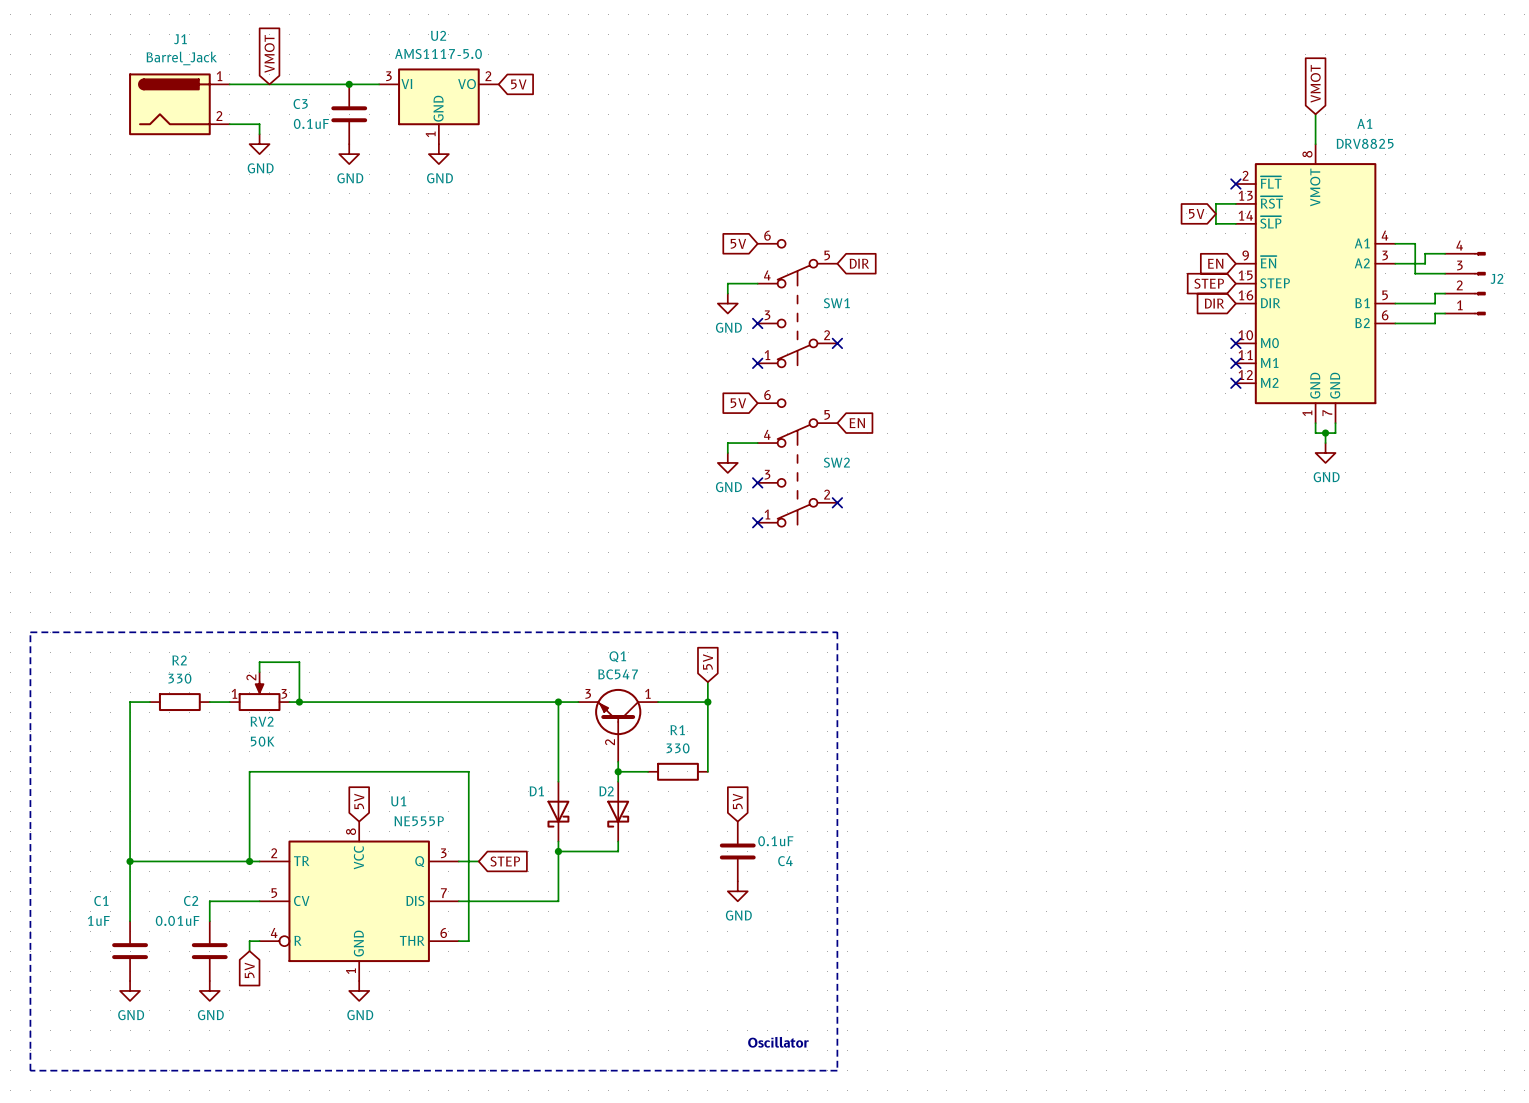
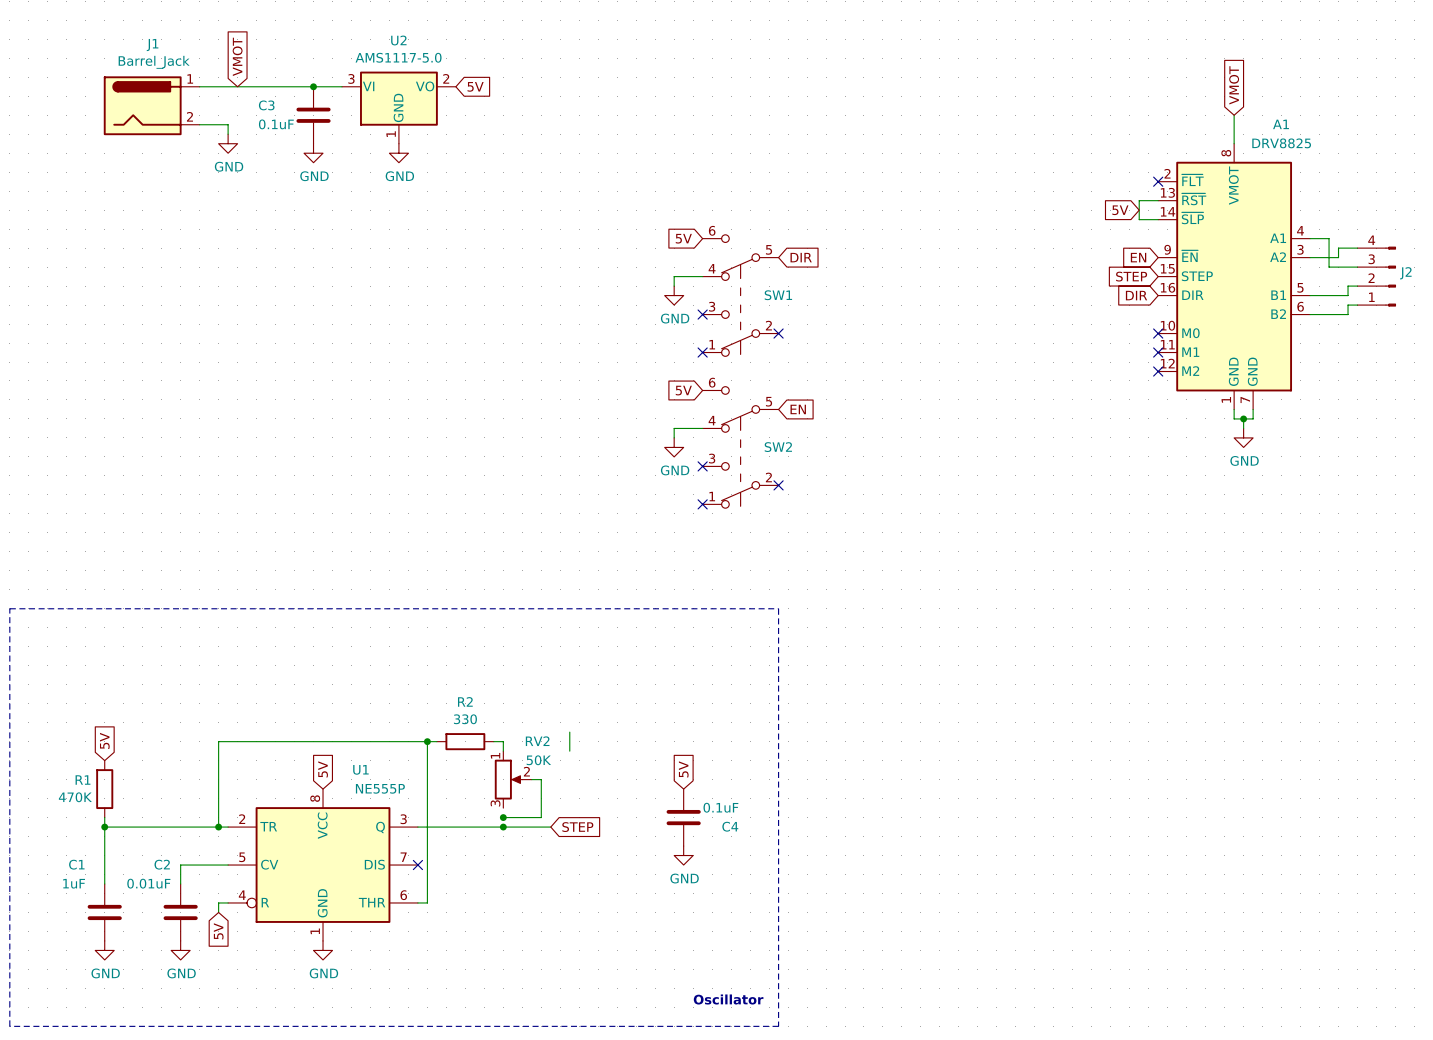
global label: 5V (707, 661) -> none
wire: (259, 672) (259, 662) (299, 662) (299, 702) -> none
wire: (707, 682) (707, 771) -> none
RV2 position: (259, 691) -> (513, 779)
RV2 rotation: 0° (259, 696) -> 90° clockwise (508, 779)
wire: (149, 702) (130, 702) (130, 851) -> none
R2 position: (179, 702) -> (465, 741)
wire: (209, 702) (229, 702) -> none
wire: (289, 702) (578, 702) -> none
junction: (299, 702) -> none
wire: (558, 702) (558, 781) -> none
junction: (558, 702) -> none
wire: (658, 702) (707, 702) -> none
junction: (707, 702) -> none
RV2 name position: RV2 (262, 721) -> RV2 (537, 741)
Q1: BC547 (618, 725) -> none
R1 name position: R1 (677, 730) -> R1 (83, 780)
RV2 value position: 50K (262, 741) -> 50K (538, 760)
R1 value: 330 (678, 748) -> 470K (75, 797)
global label: none -> 5V (104, 740)
wire: none -> (427, 741) (436, 741)
junction: none -> (427, 741)
wire: none -> (493, 741) (503, 741) (503, 751)
wire: (618, 771) (648, 771) -> none
junction: (618, 771) -> none
R1 rotation: 0° (677, 771) -> 90° clockwise (104, 789)
R1 position: (677, 771) -> (104, 789)
D1: (558, 811) -> none
D2: (618, 811) -> none
wire: (558, 841) (558, 901) (458, 901) -> none
wire: (618, 841) (618, 851) (588, 851) -> (531, 779) (541, 779) (541, 817)
wire: none -> (503, 817) (512, 817)
junction: none -> (503, 817)
junction: (558, 851) -> none
wire: none -> (436, 827) (550, 827)
global label position: STEP (505, 861) -> STEP (577, 827)
junction: none -> (503, 827)
no-connect mark: none -> (417, 865)

